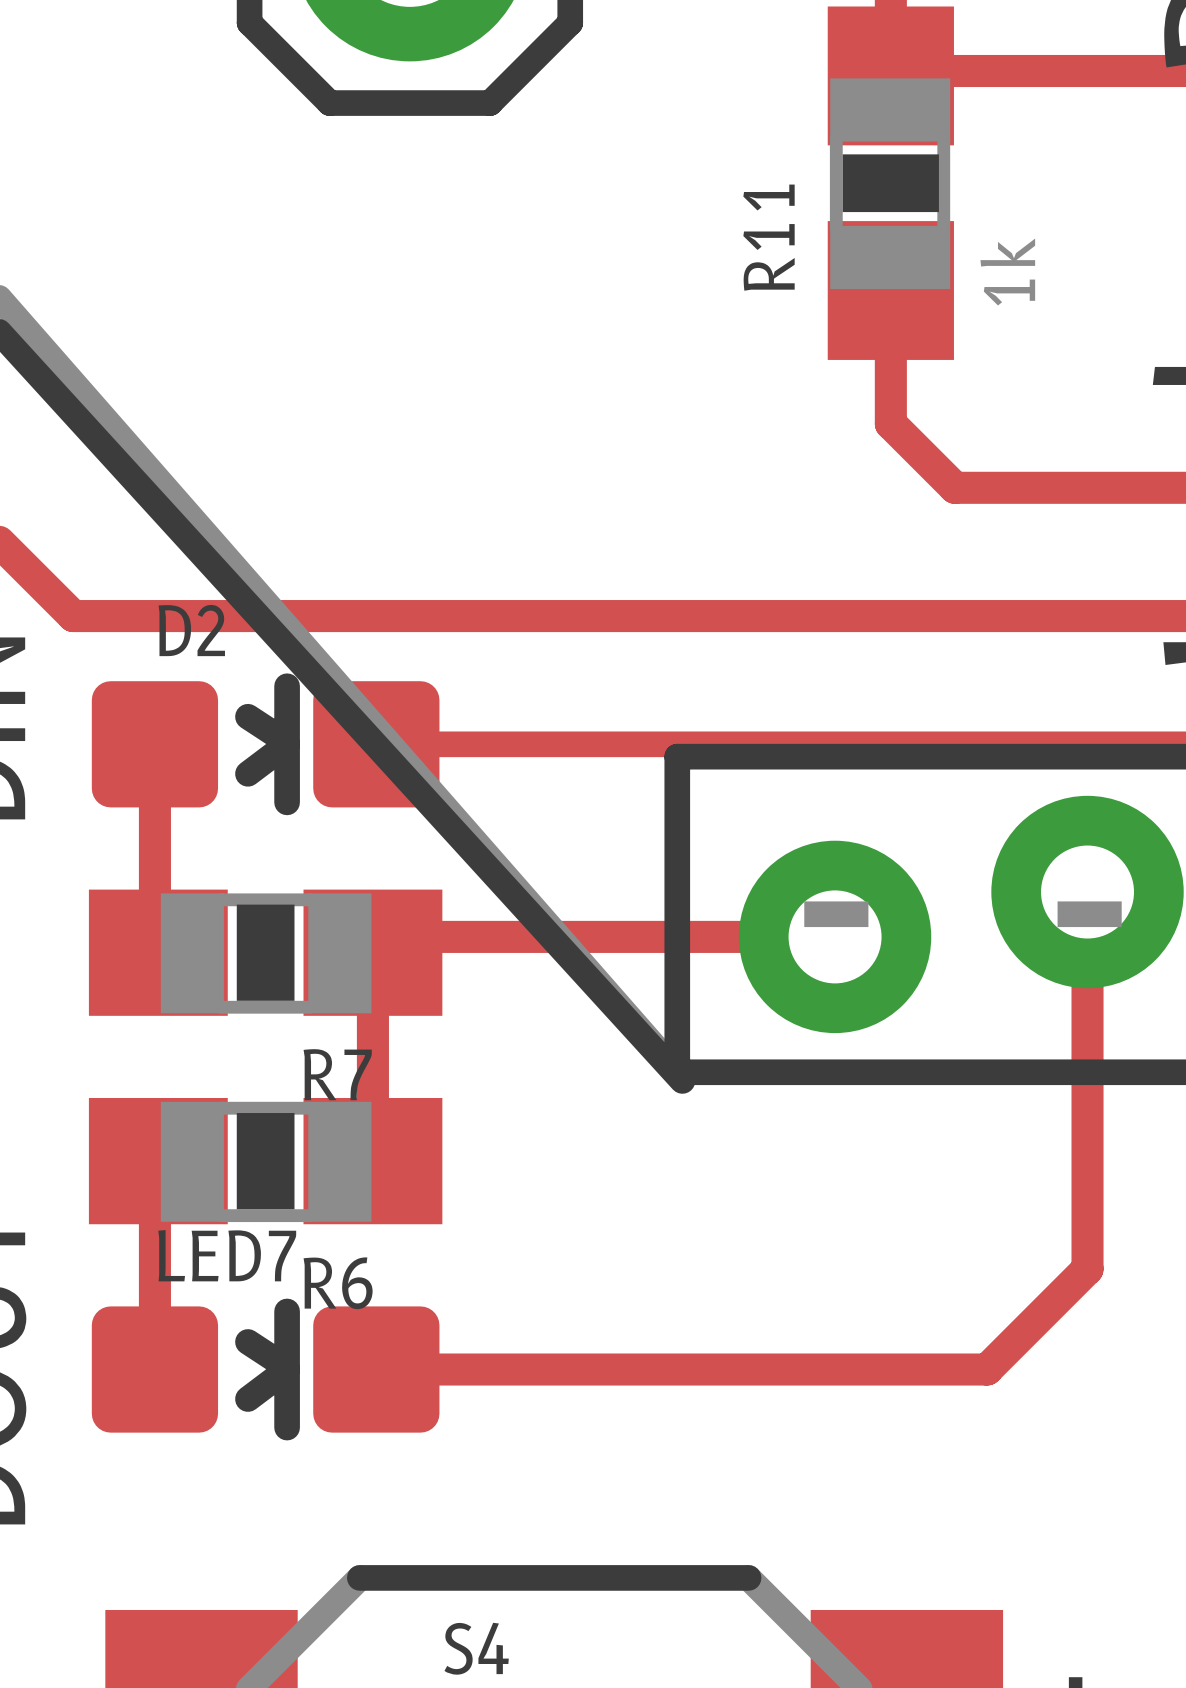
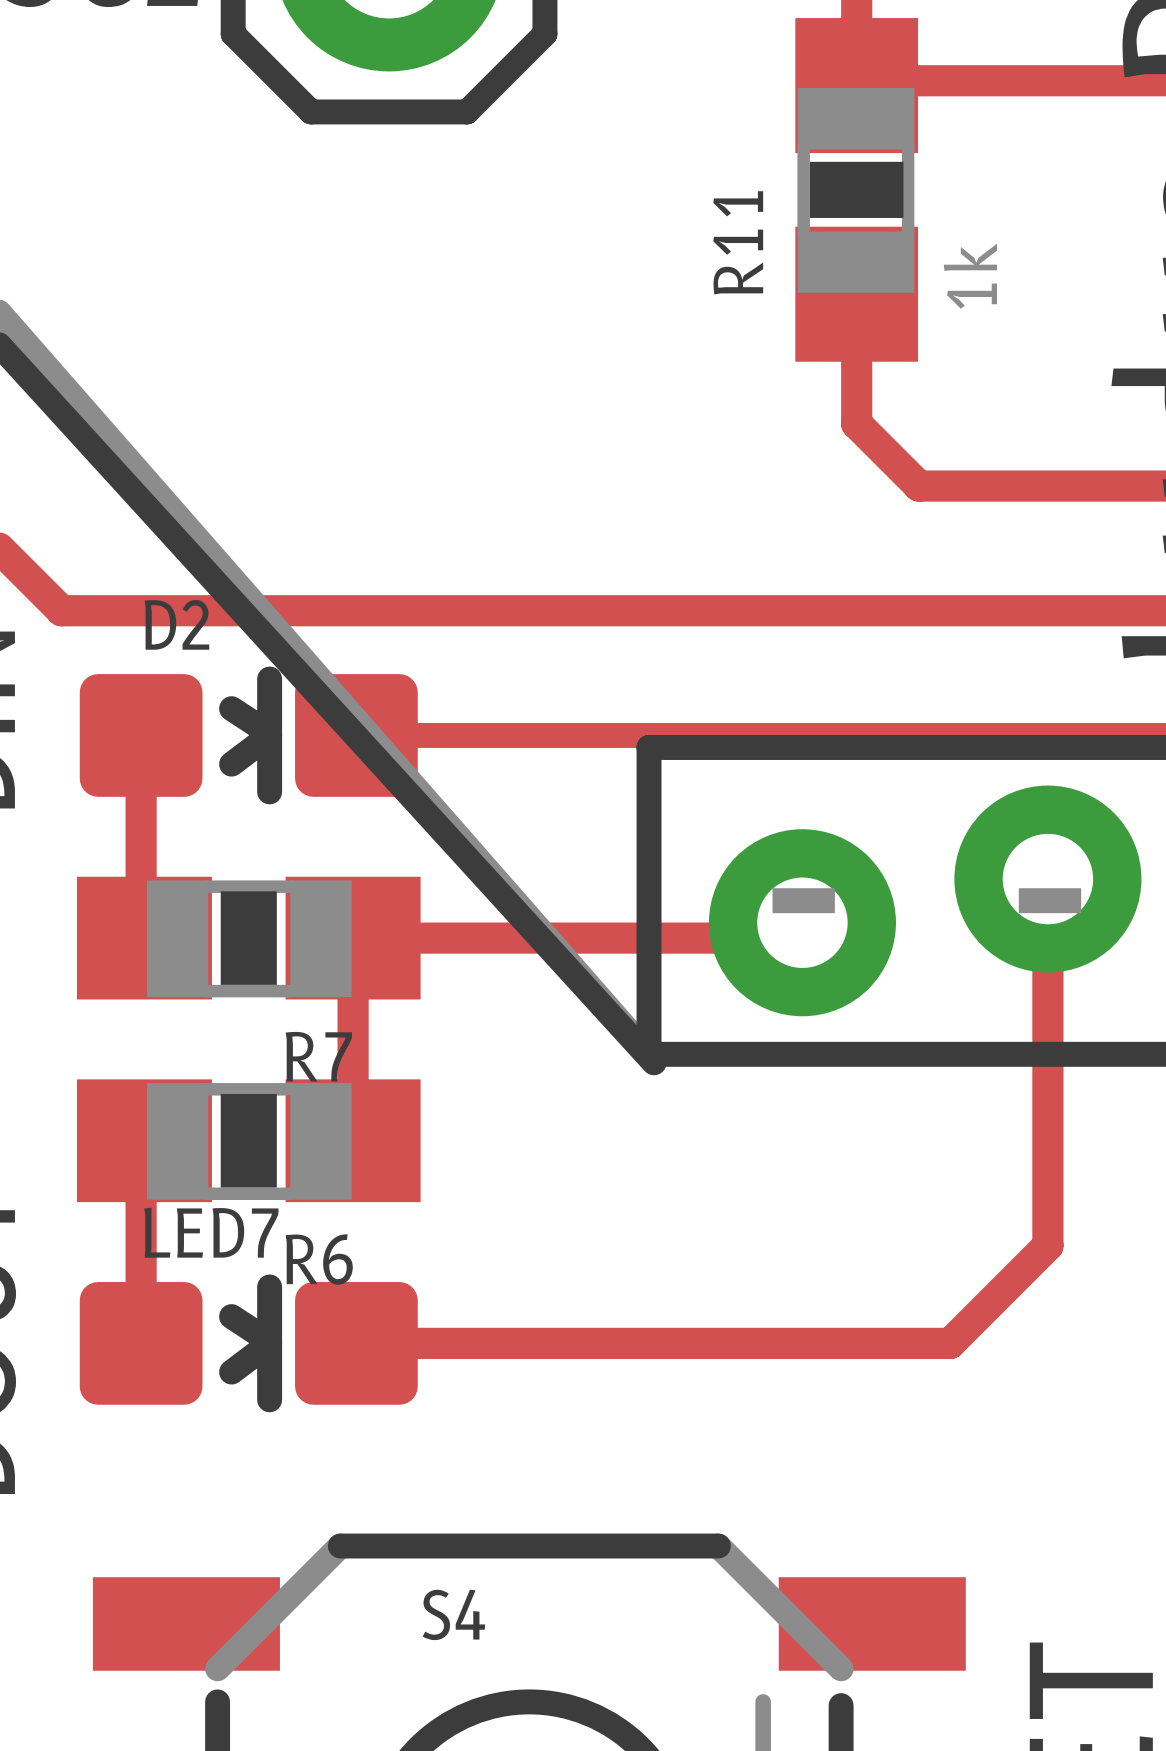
track: (373, 936) (835, 936) -> (353, 938) (787, 938) (802, 922)

